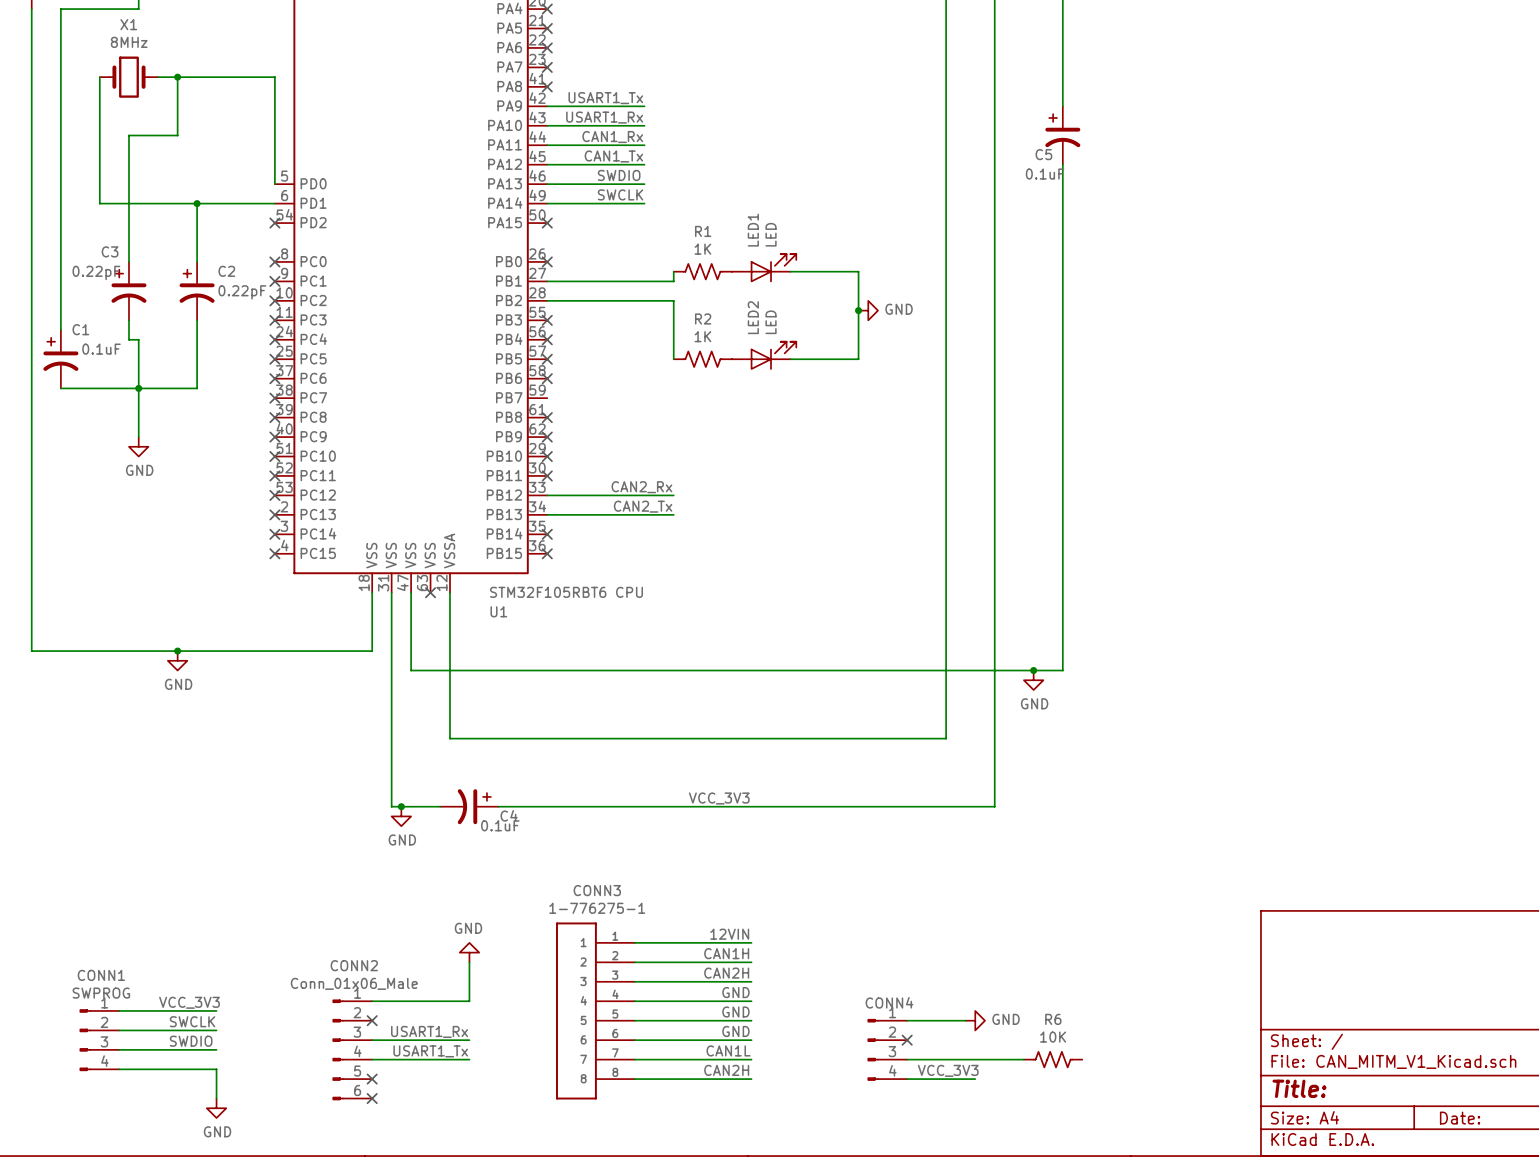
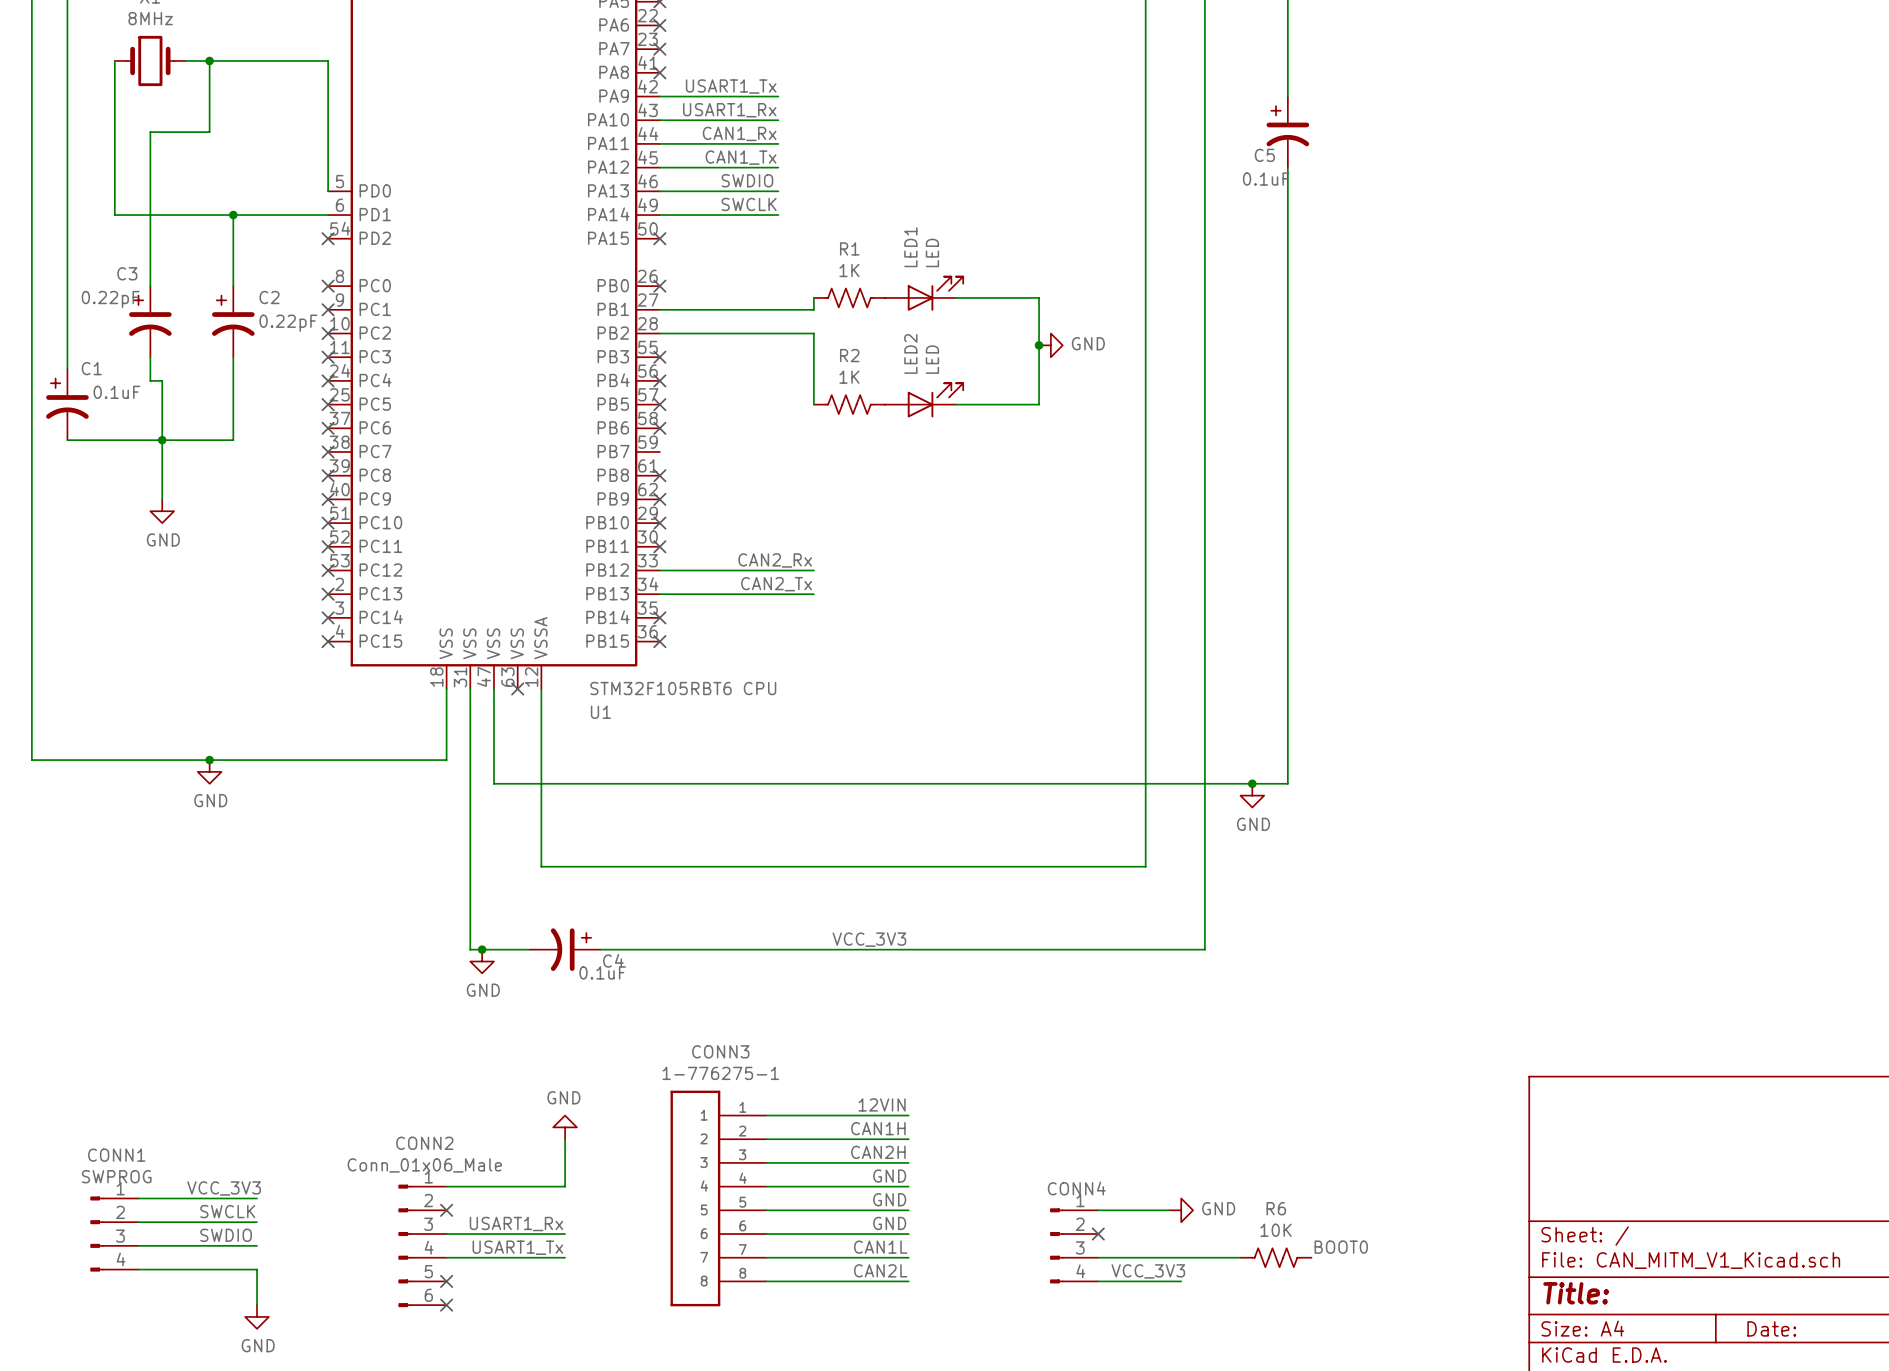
label: none -> BOOT0 (1341, 1247)
label: CAN2H (726, 1070) -> CAN2L (880, 1270)

